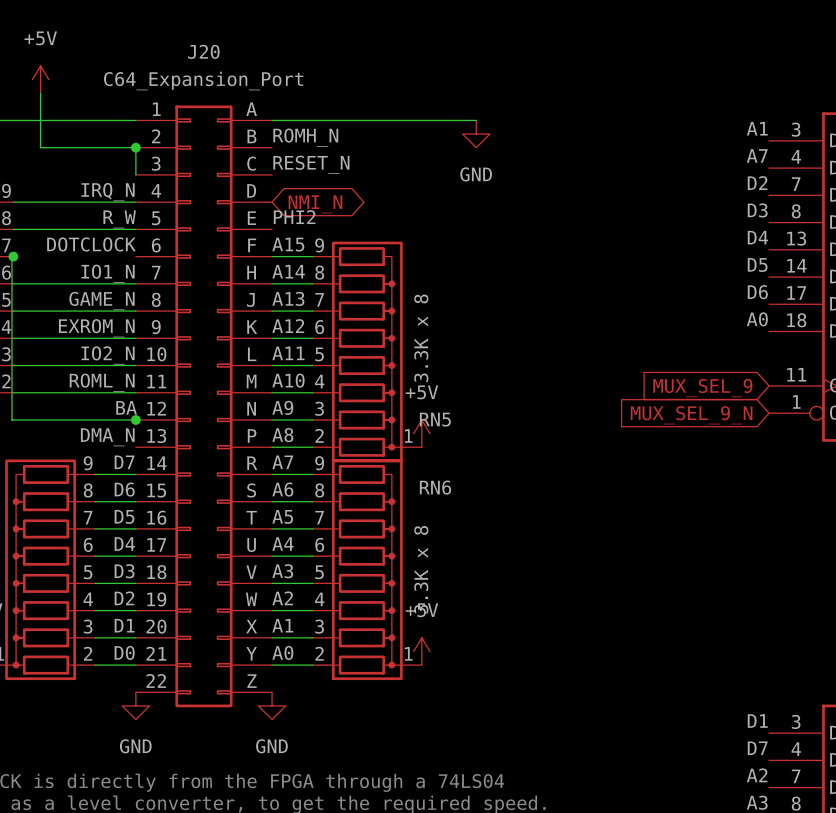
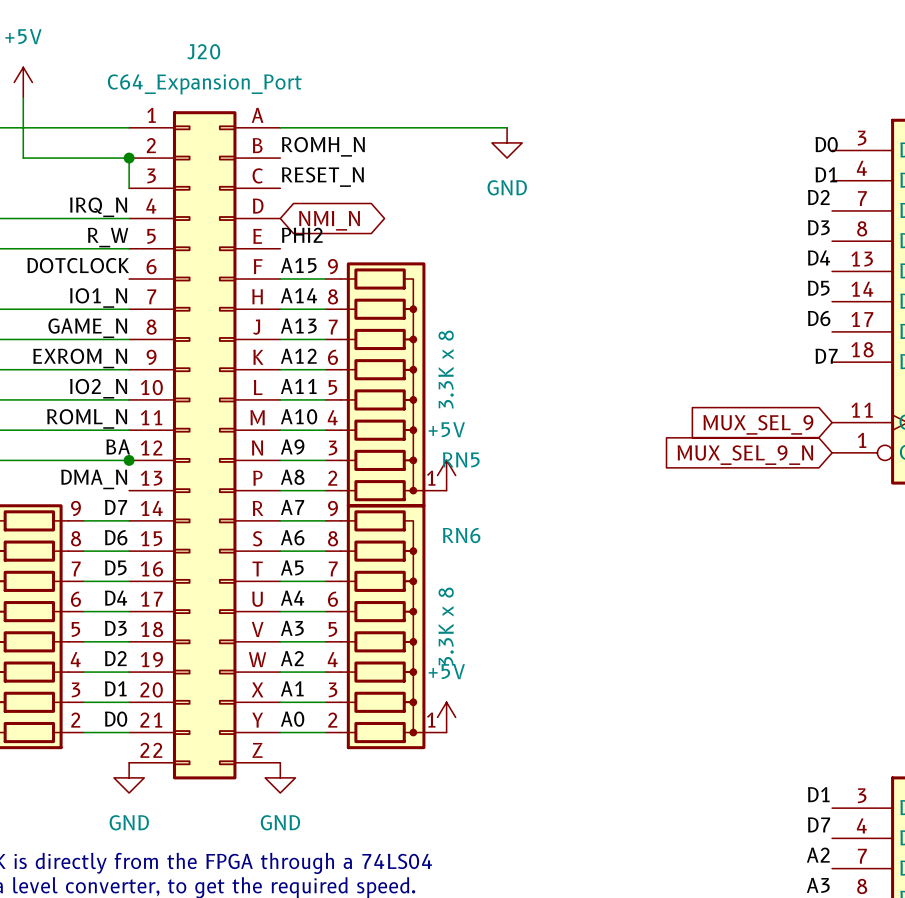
label: A1 (757, 128) -> D0 (826, 144)
label: A7 (757, 155) -> D1 (826, 174)
label: A0 (757, 319) -> D7 (826, 356)

